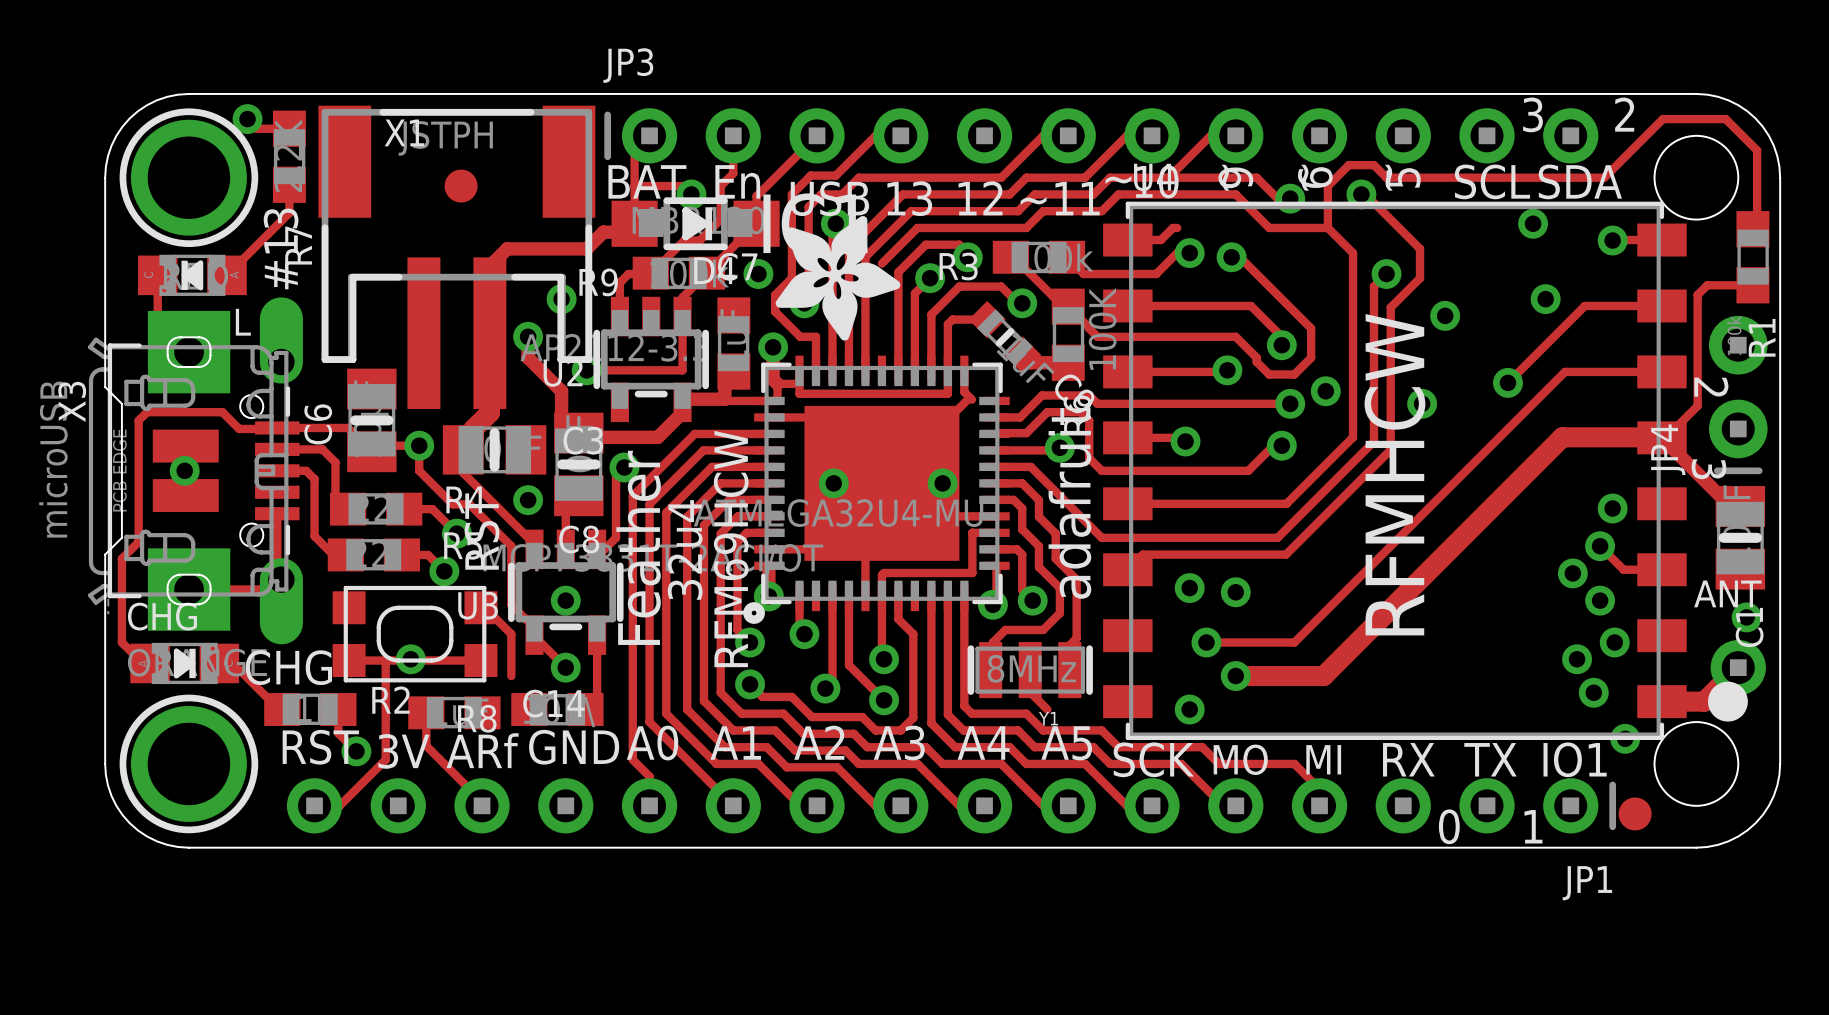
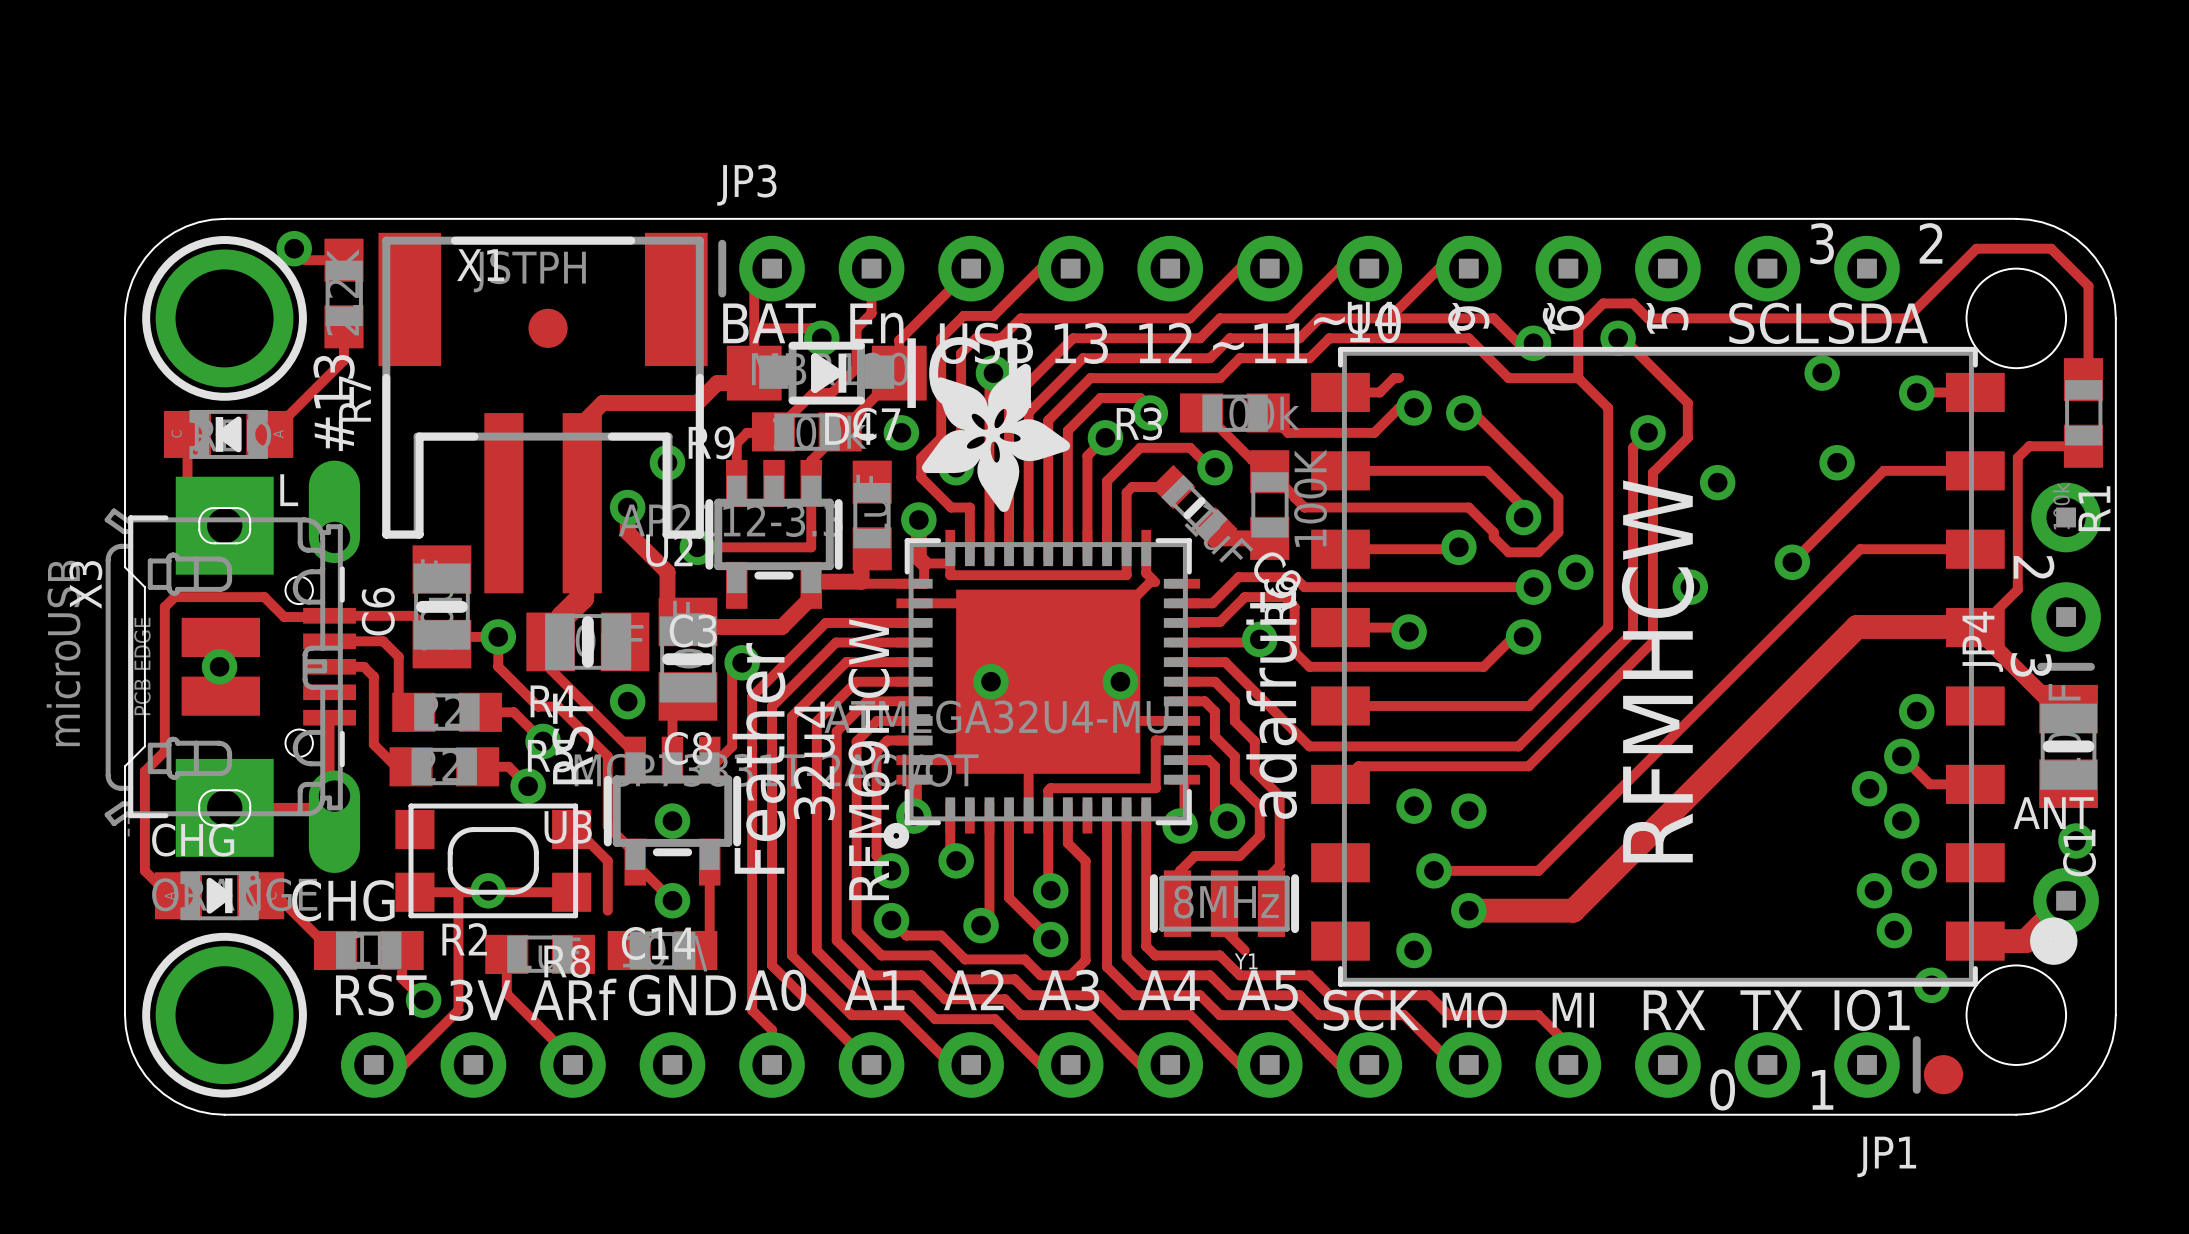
track: none -> (1048, 420) (1048, 545)

